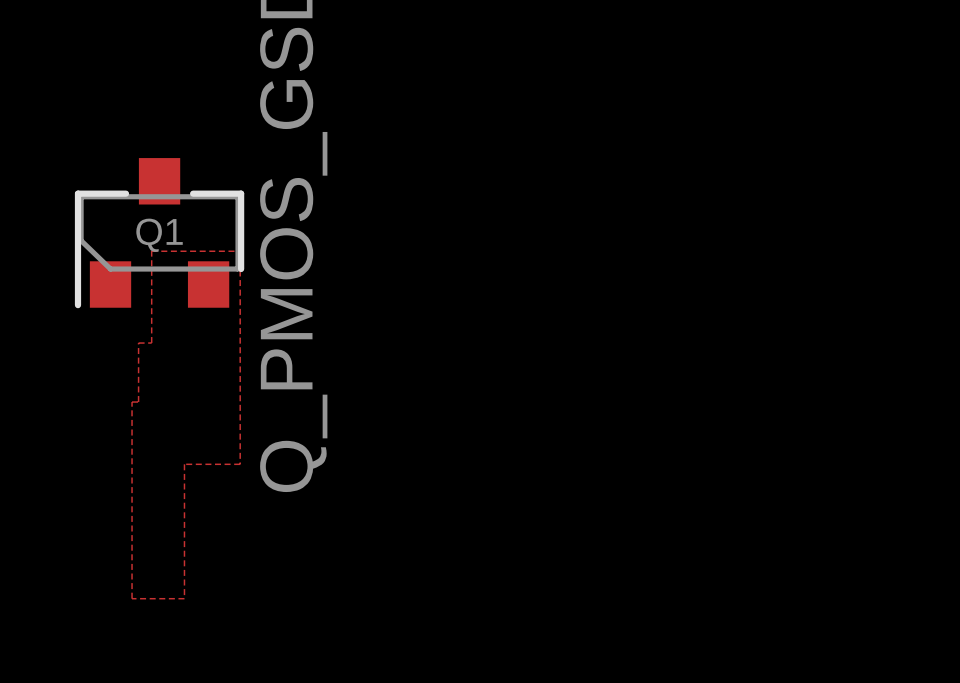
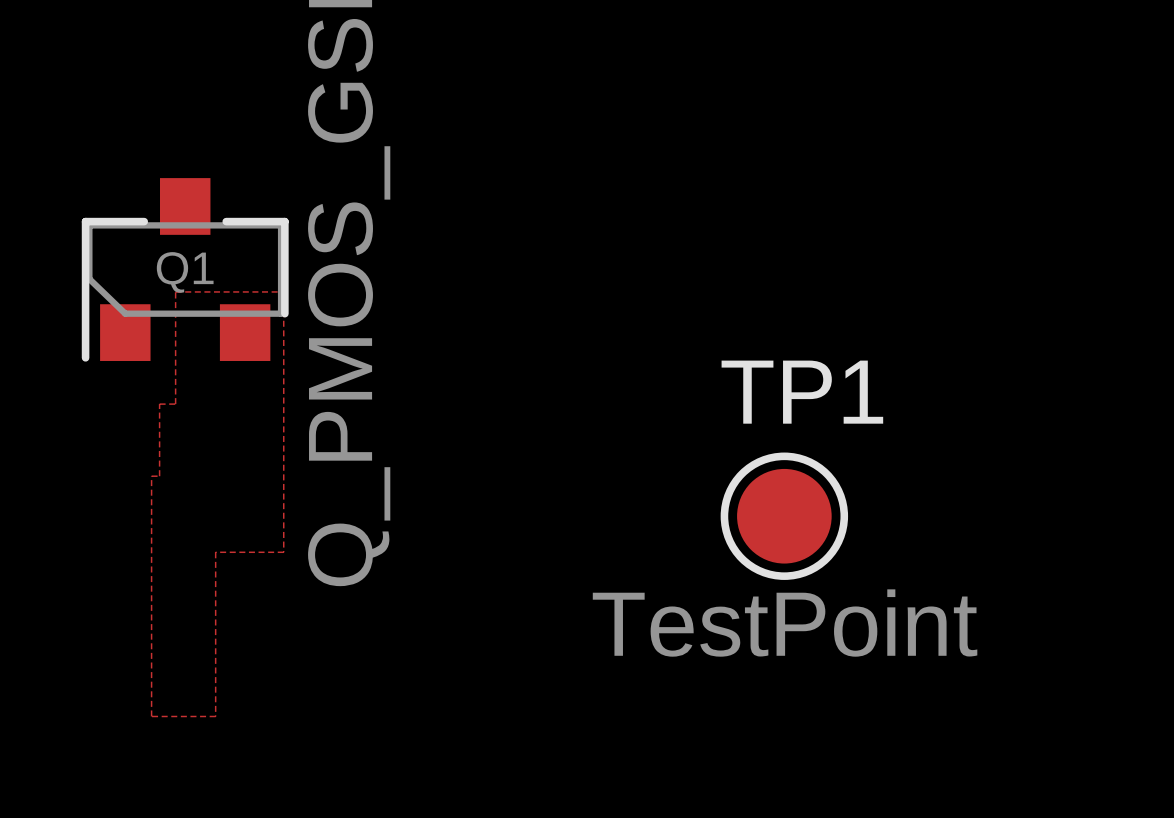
TP1: none -> TestPoint (784, 516)

